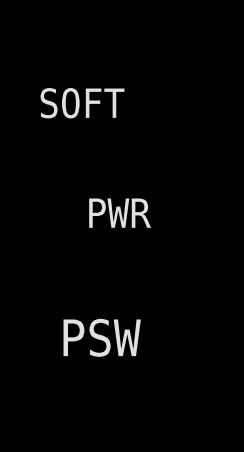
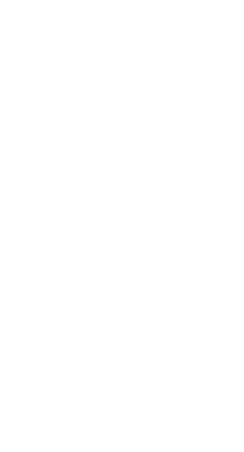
text: SOFT (82, 103) -> none
text: PWR (120, 213) -> none
text: PSW (102, 337) -> none

